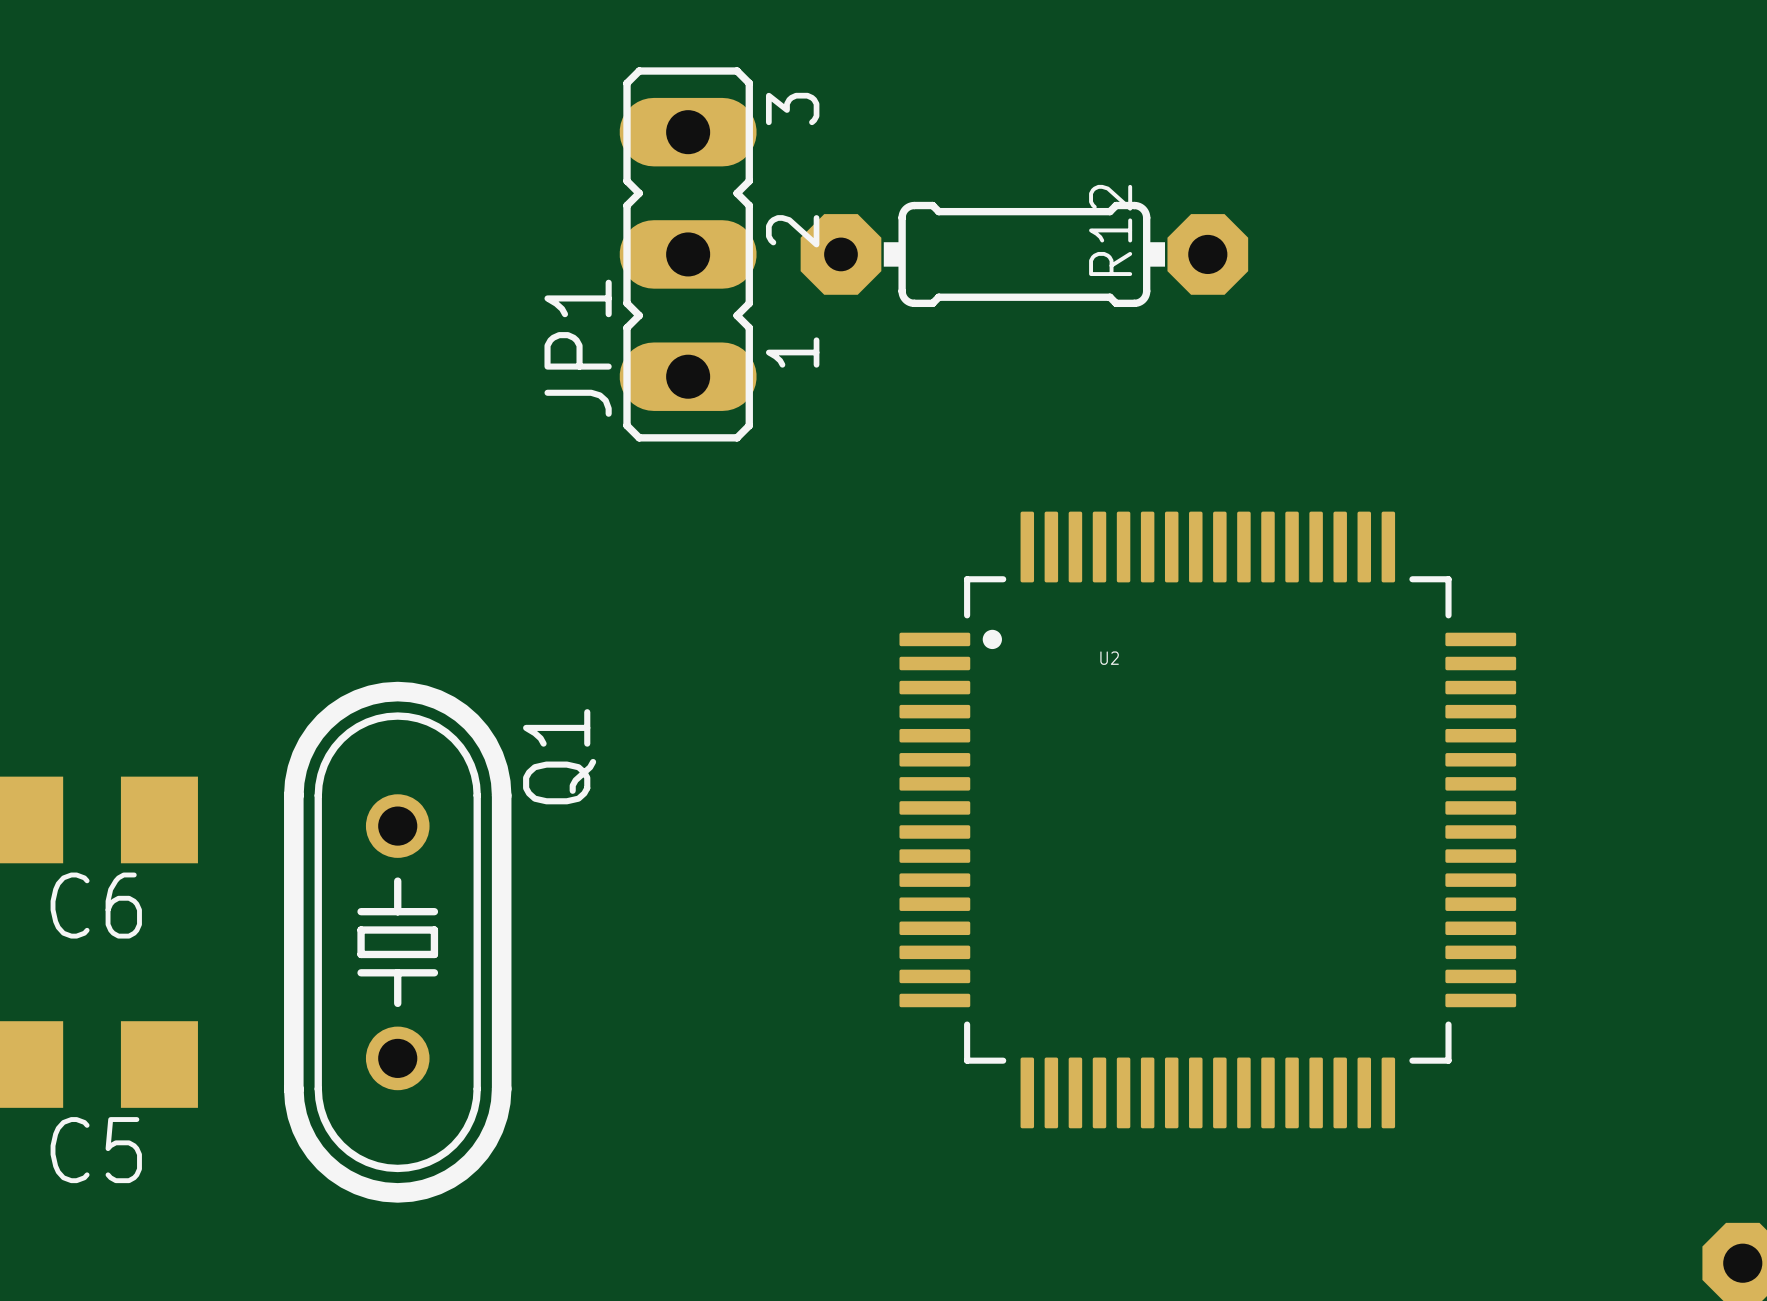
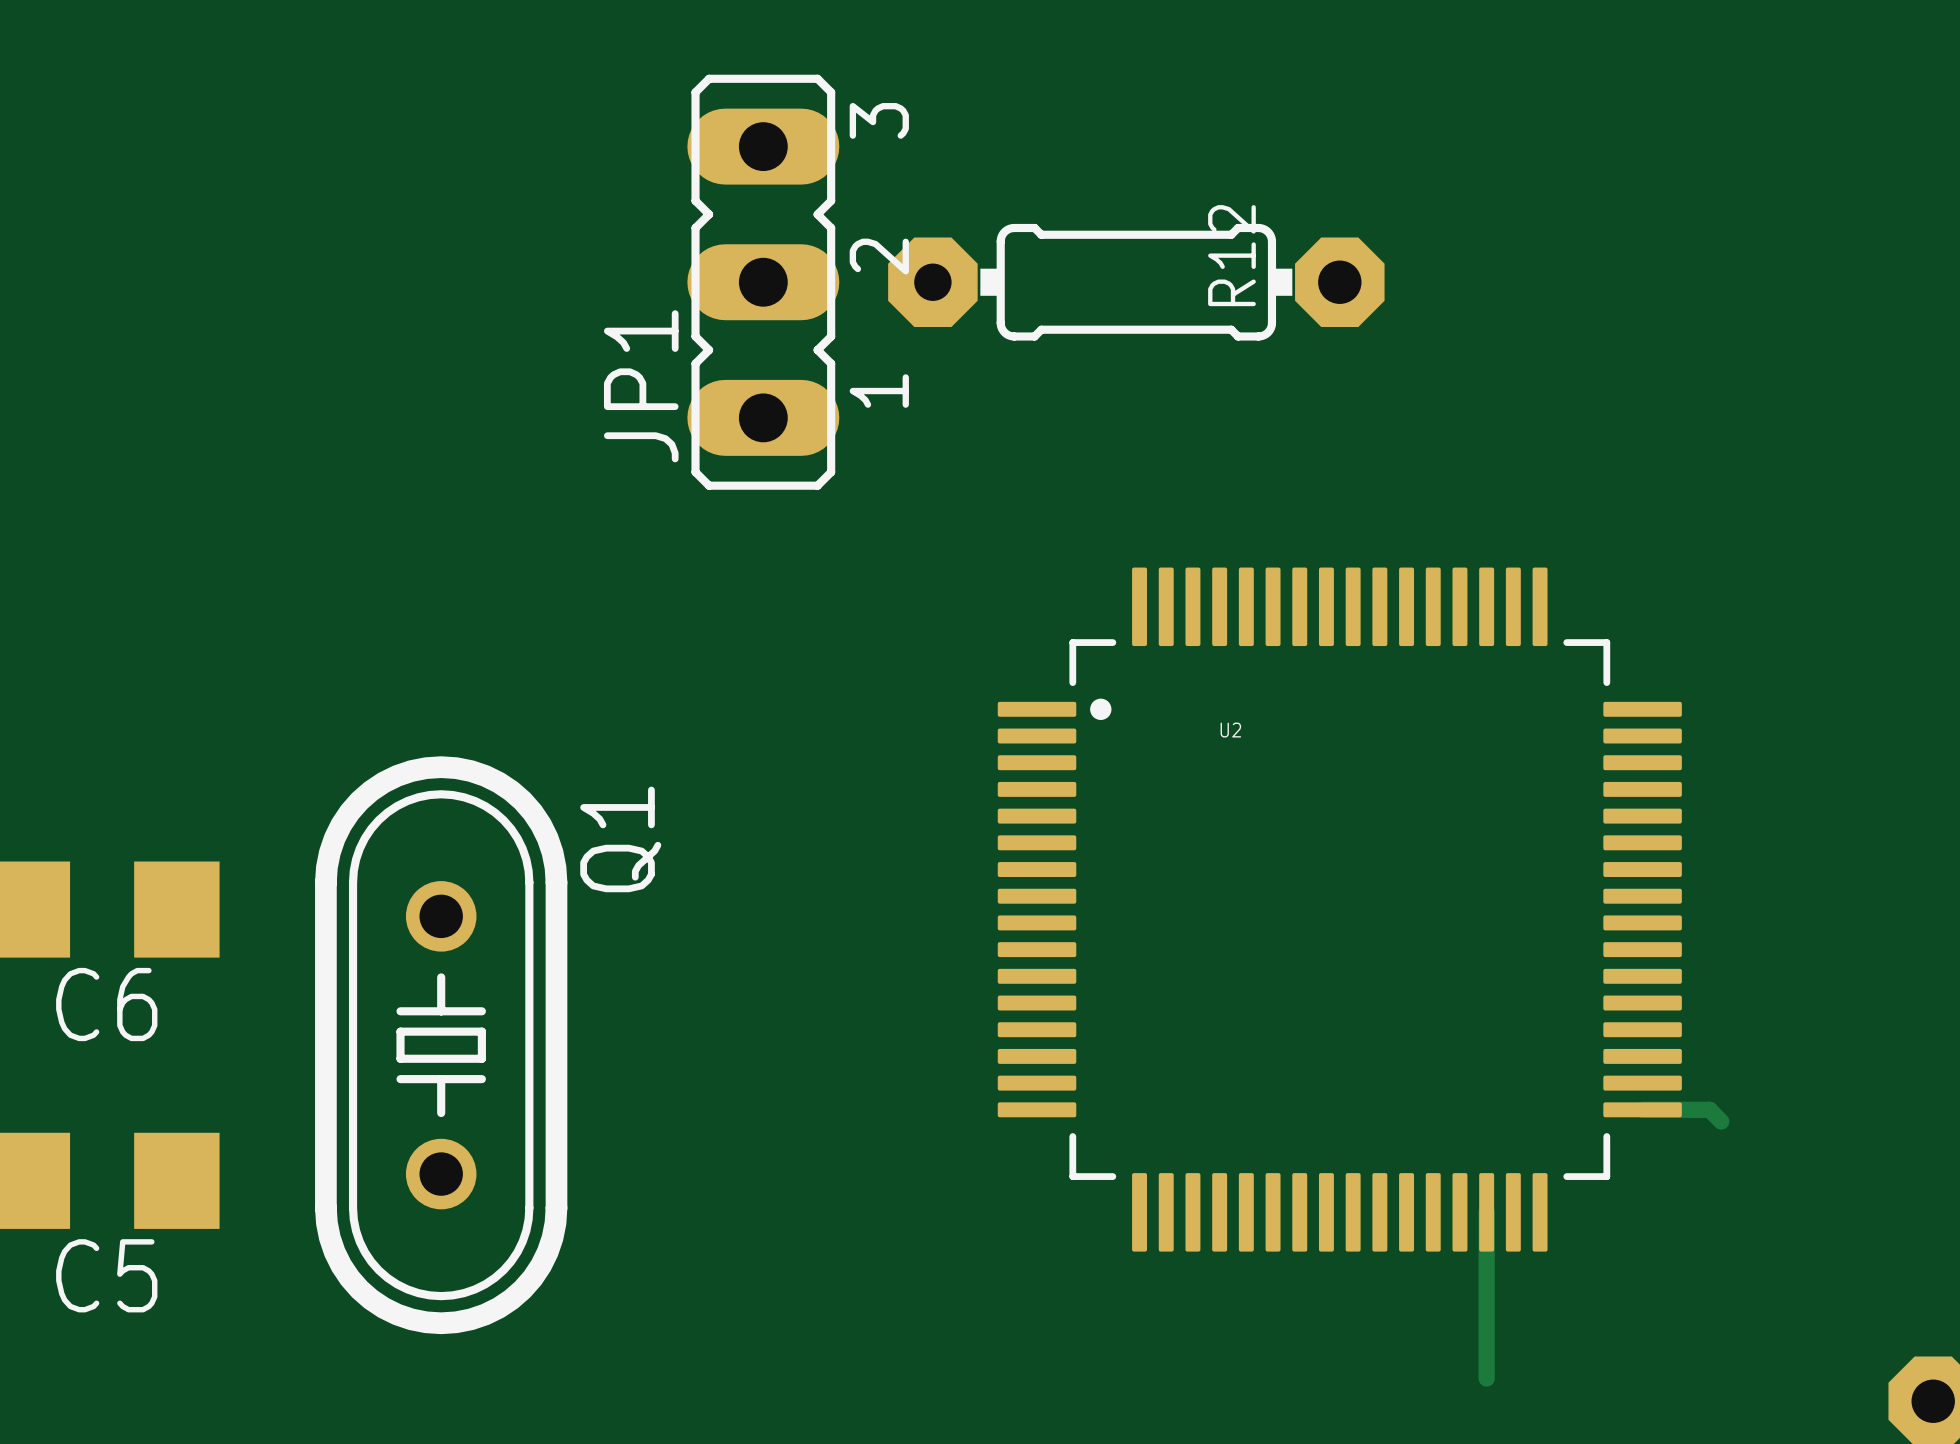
track: none -> (1642, 1109) (1709, 1109) (1721, 1121)
track: none -> (1486, 1212) (1486, 1378)

